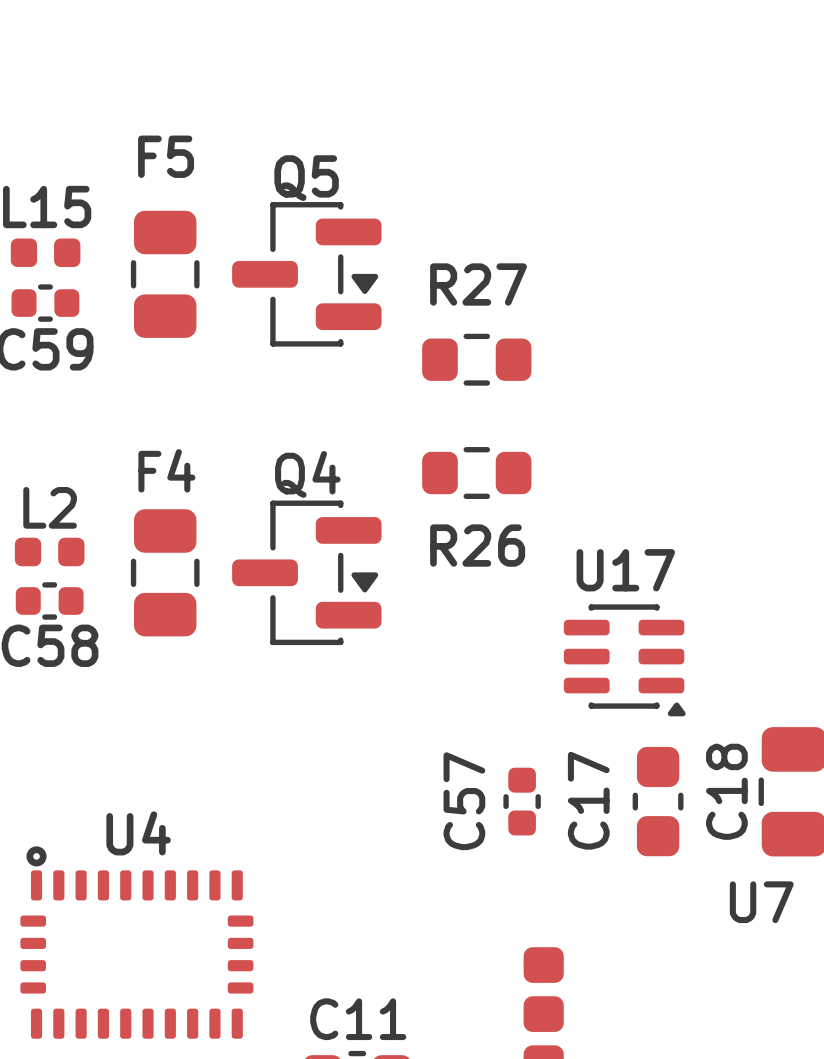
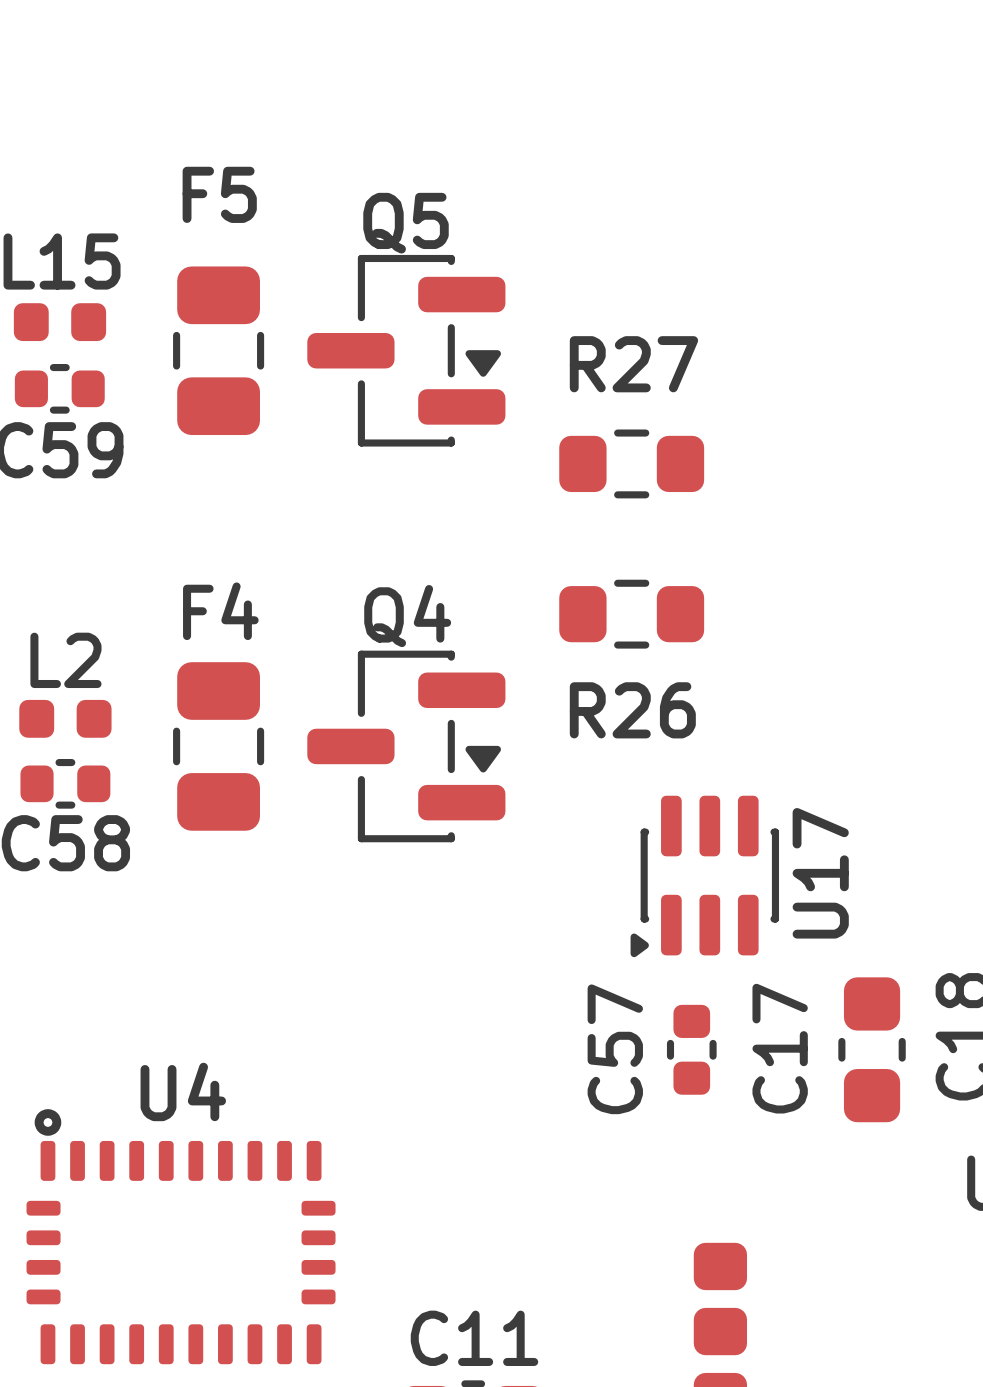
U17 rotation: 0° (624, 660) -> 90° clockwise (704, 876)
U17 position: (624, 660) -> (704, 876)

